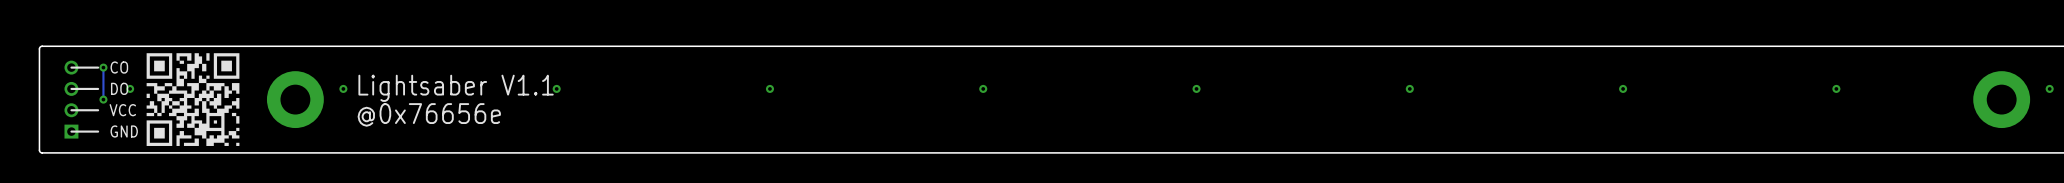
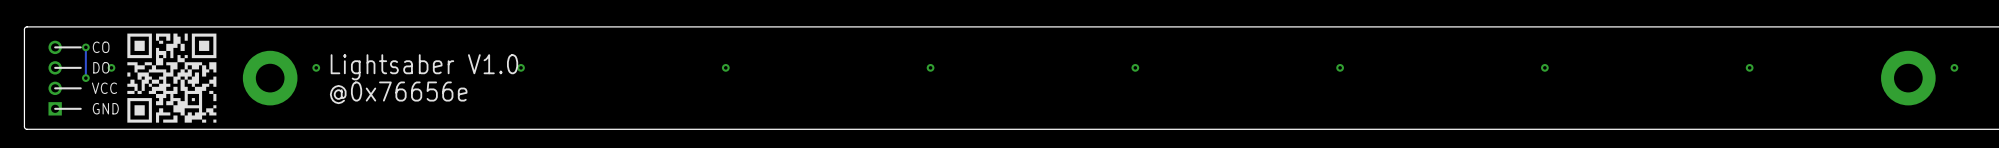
text: Lightsaber V1.1 (456, 88) -> Lightsaber V1.0 (424, 67)

